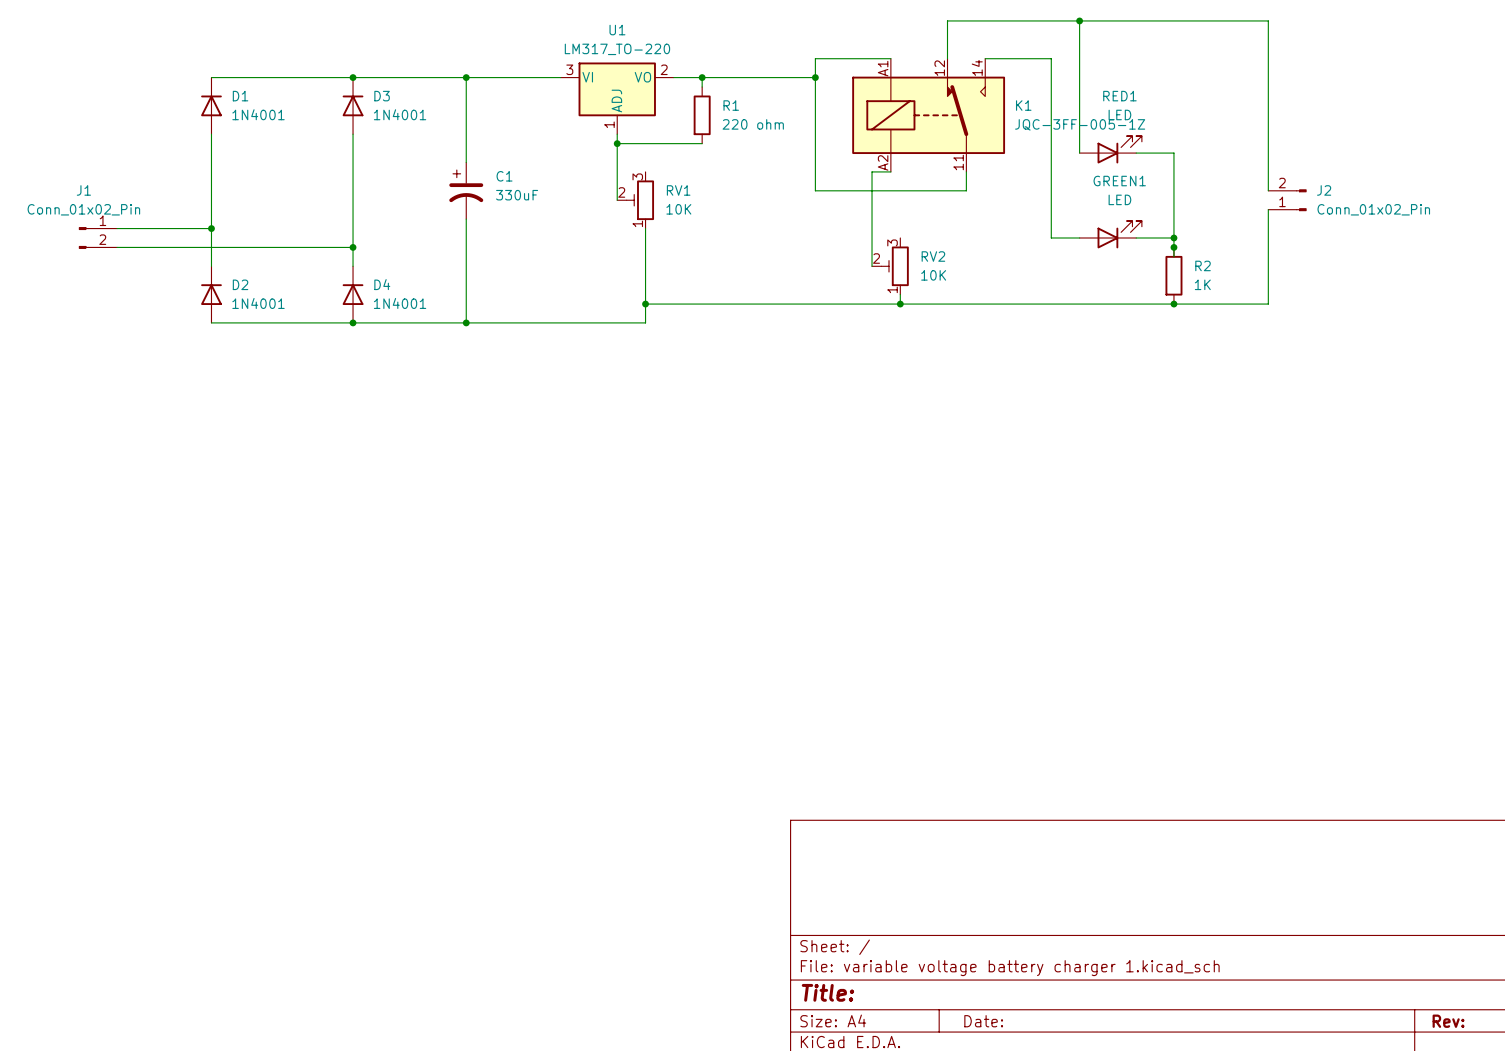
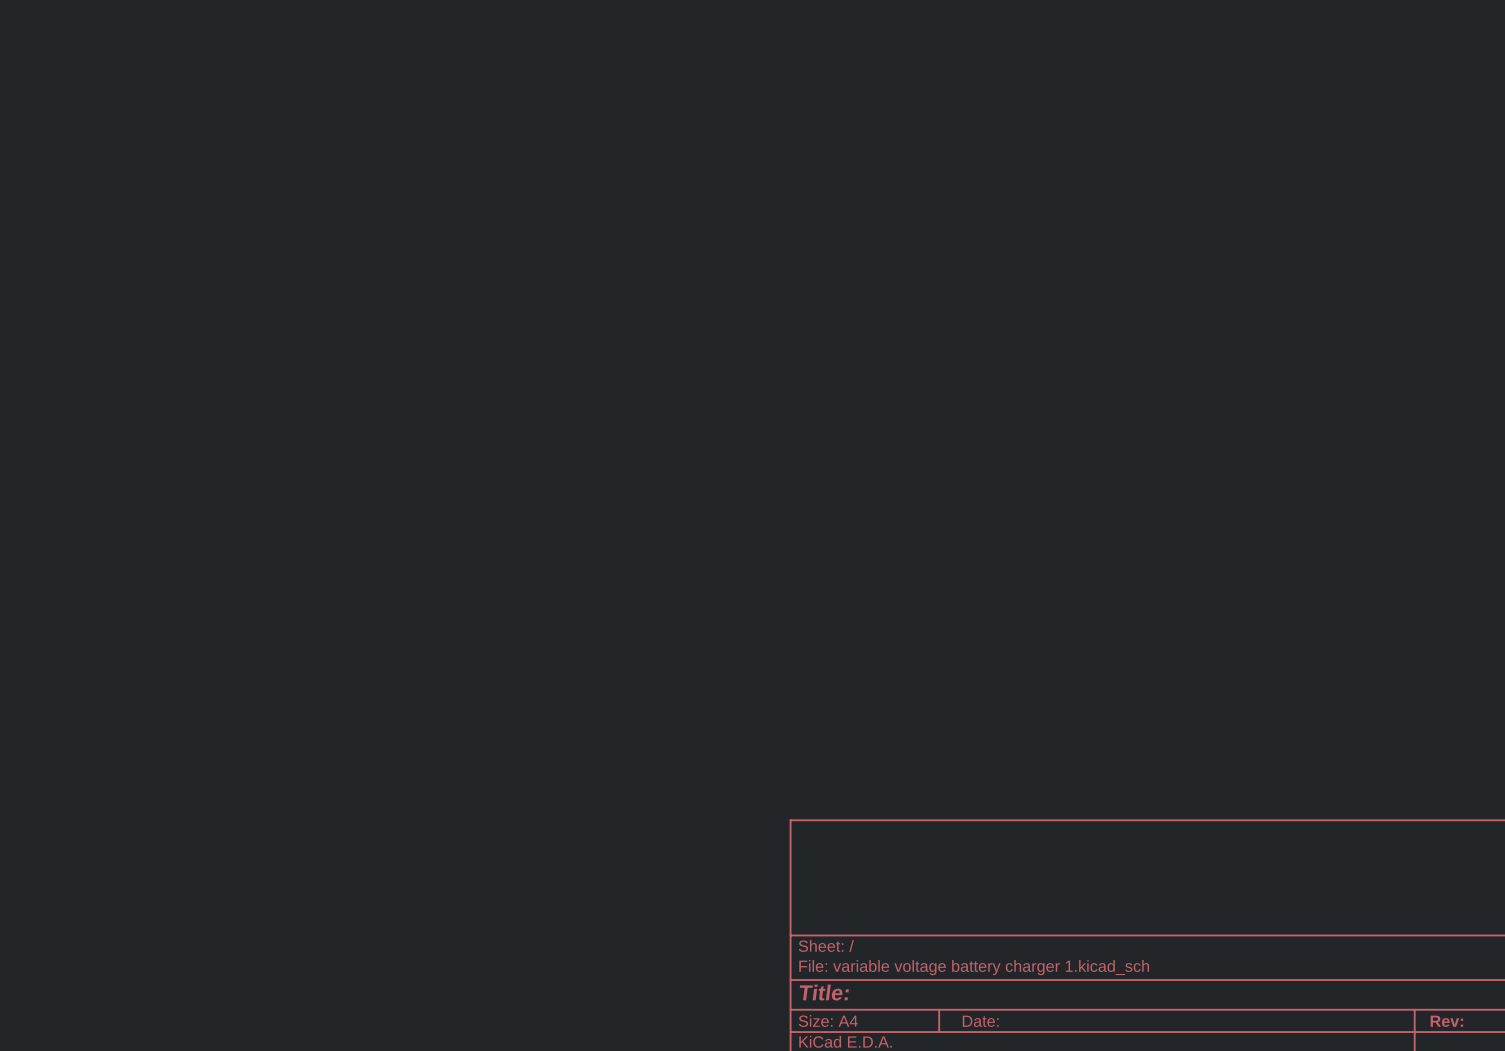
wire: (1079, 20) (1079, 153) -> none
junction: (1079, 20) -> none
wire: (890, 58) (815, 58) (815, 190) (966, 190) (966, 171) -> none
wire: (947, 58) (947, 20) (1268, 20) (1268, 190) -> none
wire: (985, 58) (1051, 58) (1051, 237) (1079, 237) -> none
wire: (211, 77) (560, 77) -> none
junction: (353, 77) -> none
wire: (466, 77) (466, 162) -> none
junction: (466, 77) -> none
wire: (673, 77) (815, 77) -> none
wire: (702, 77) (702, 87) -> none
junction: (702, 77) -> none
junction: (815, 77) -> none
U1: LM317_TO-220 (617, 98) -> none
D1: 1N4001 (211, 105) -> none
D3: 1N4001 (353, 105) -> none
R1: 220 ohm (702, 115) -> none
K1: JQC-3FF-005-1Z (928, 115) -> none
wire: (211, 134) (211, 266) -> none
wire: (353, 134) (353, 266) -> none
wire: (617, 134) (617, 200) -> none
wire: (617, 143) (702, 143) -> none
junction: (617, 143) -> none
RED1: LED (1110, 149) -> none
wire: (1136, 153) (1173, 153) (1173, 256) -> none
wire: (890, 171) (872, 171) (872, 266) -> none
C1: 330uF (466, 190) -> none
RV1: 10K (635, 200) -> none
J2: Conn_01x02_Pin (1287, 200) -> none
wire: (1268, 209) (1268, 304) (645, 304) -> none
wire: (466, 219) (466, 322) -> none
wire: (117, 228) (211, 228) -> none
junction: (211, 228) -> none
wire: (645, 228) (645, 322) (211, 322) -> none
GREEN1: LED (1110, 234) -> none
J1: Conn_01x02_Pin (97, 237) -> none
wire: (1136, 237) (1173, 237) -> none
junction: (1173, 237) -> none
wire: (117, 247) (353, 247) -> none
junction: (353, 247) -> none
junction: (1173, 247) -> none
RV2: 10K (890, 266) -> none
R2: 1K (1173, 275) -> none
D2: 1N4001 (211, 294) -> none
D4: 1N4001 (353, 294) -> none
wire: (900, 294) (900, 304) -> none
junction: (645, 304) -> none
junction: (900, 304) -> none
junction: (1173, 304) -> none
junction: (353, 322) -> none
junction: (466, 322) -> none

